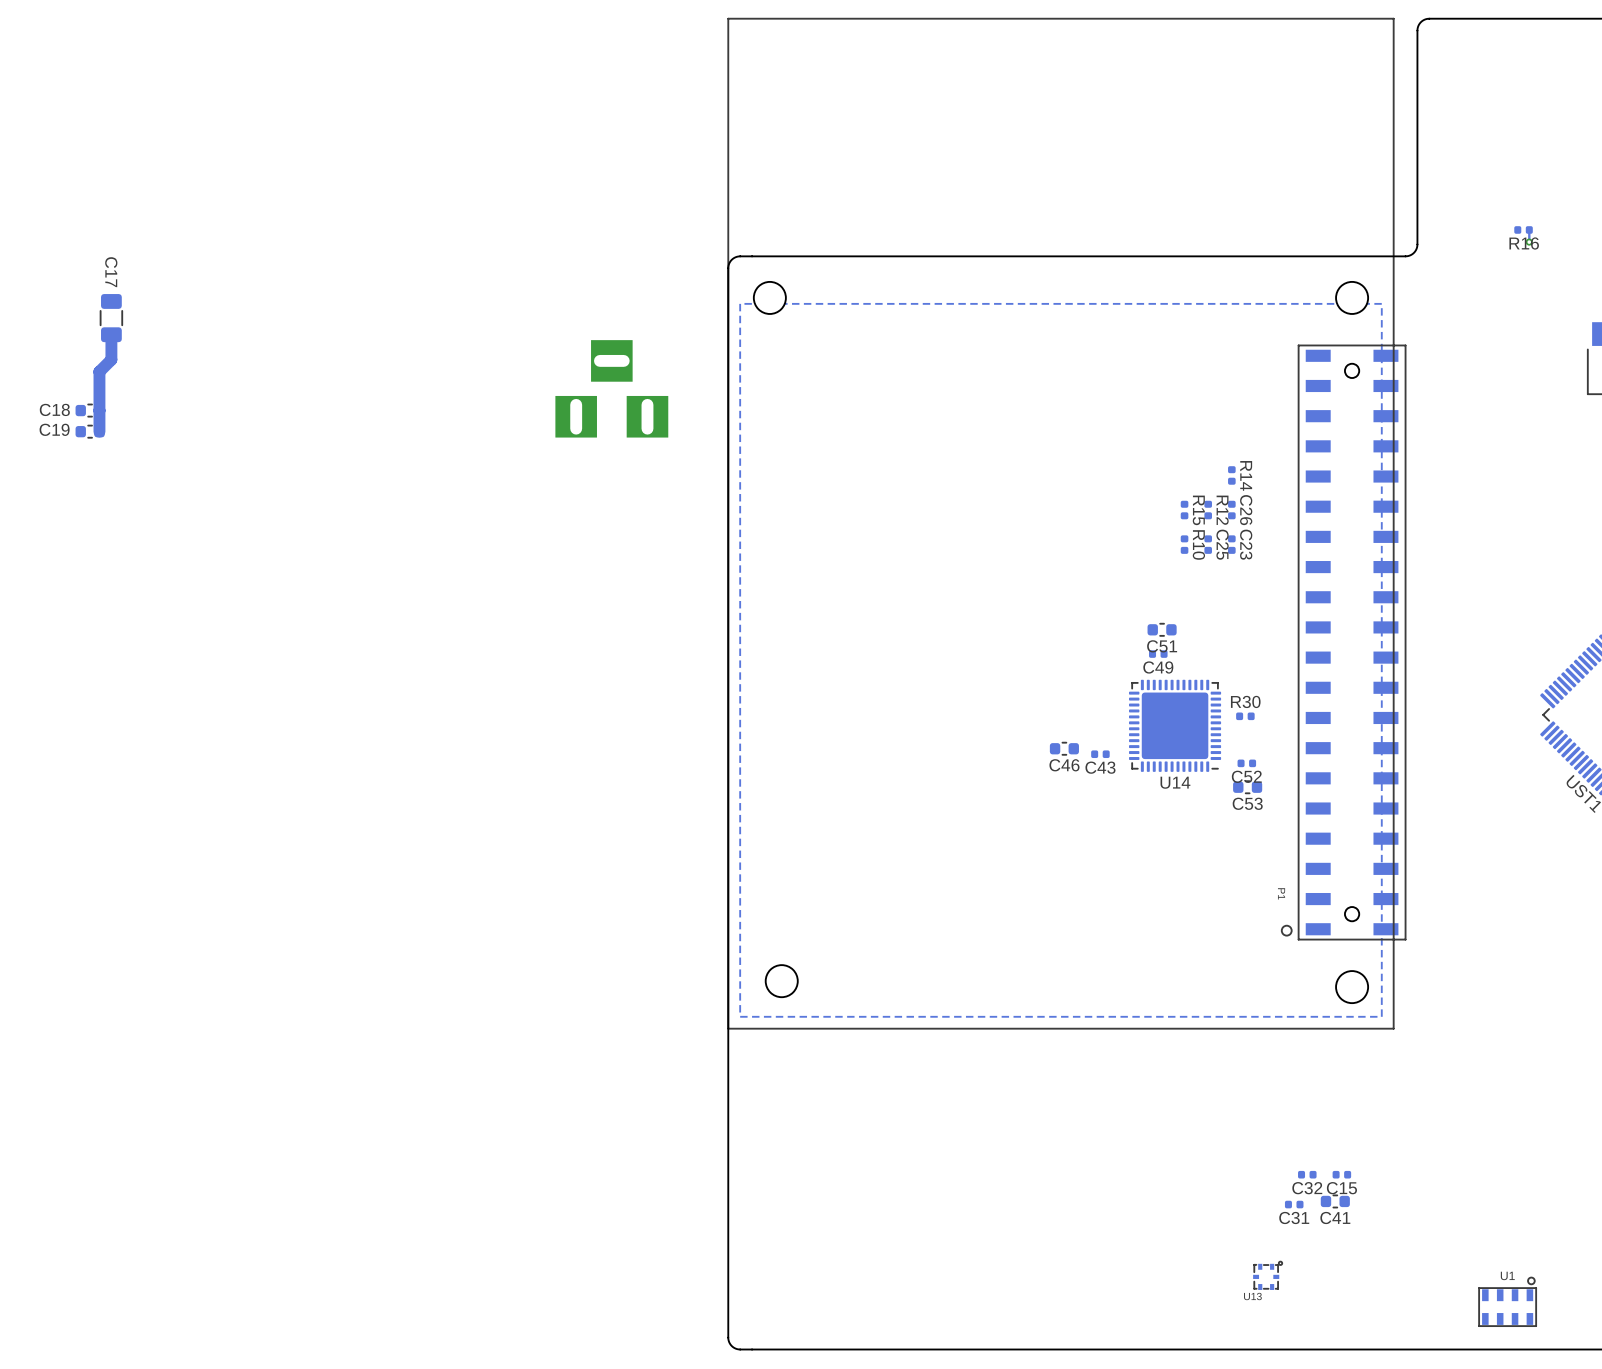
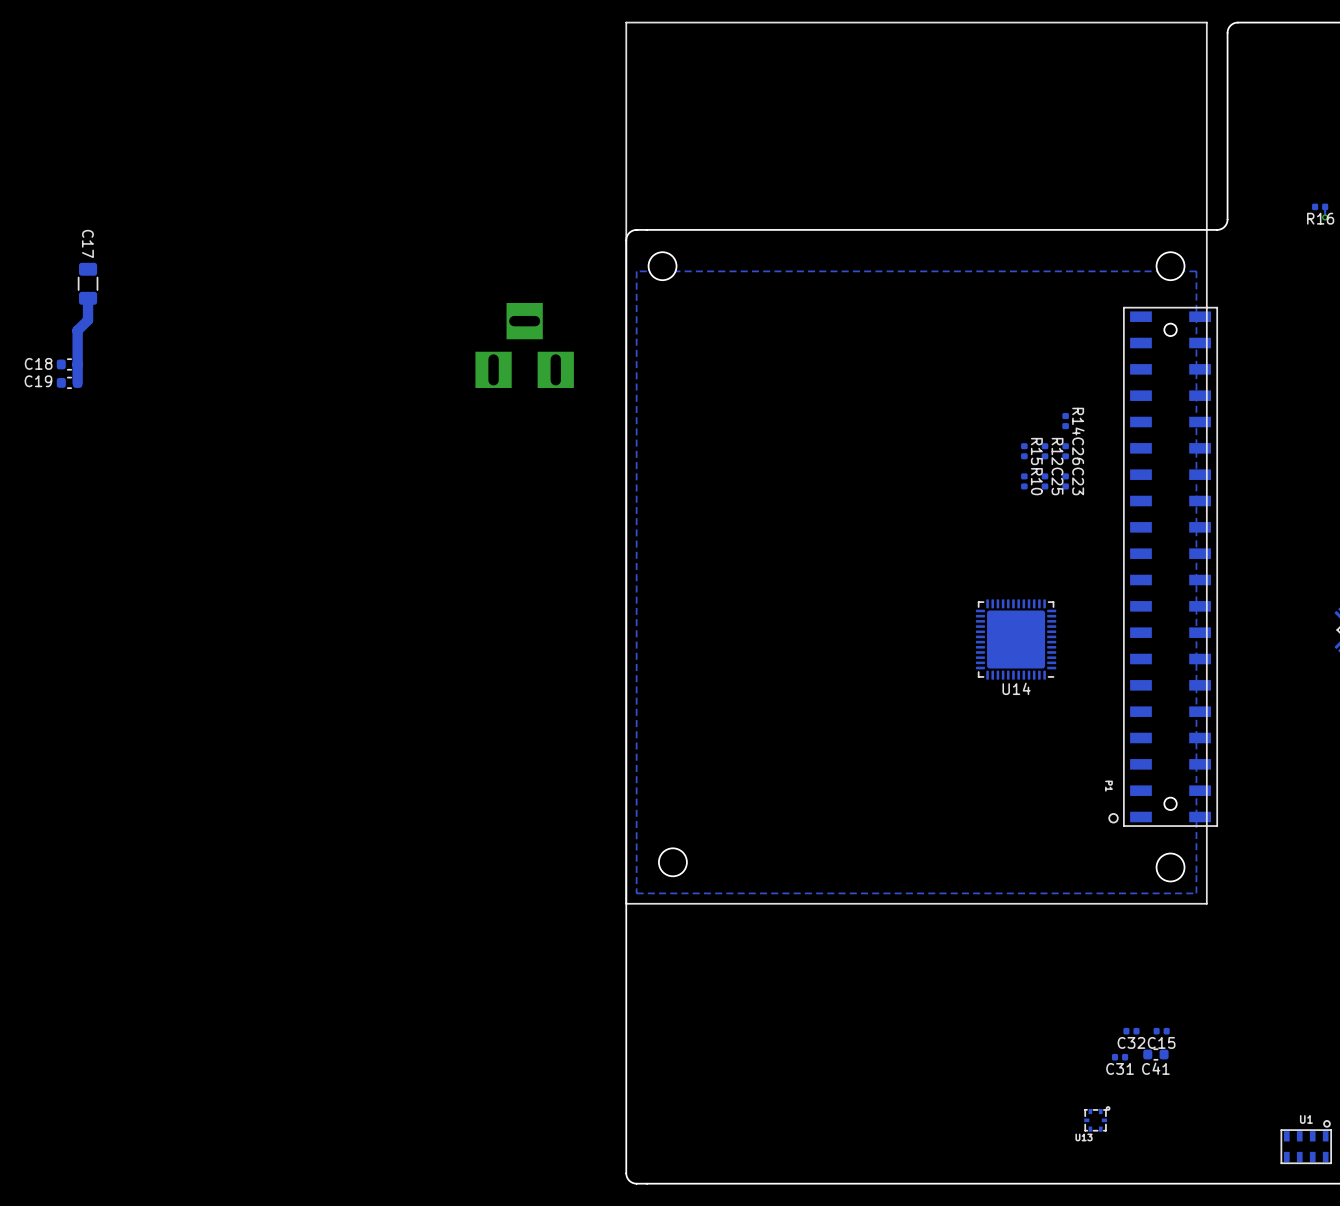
C51: (1162, 629) -> none
C49: (1158, 654) -> none
R30: (1245, 716) -> none
C46: (1064, 748) -> none
C43: (1100, 754) -> none
C52: (1246, 763) -> none
C53: (1247, 787) -> none

